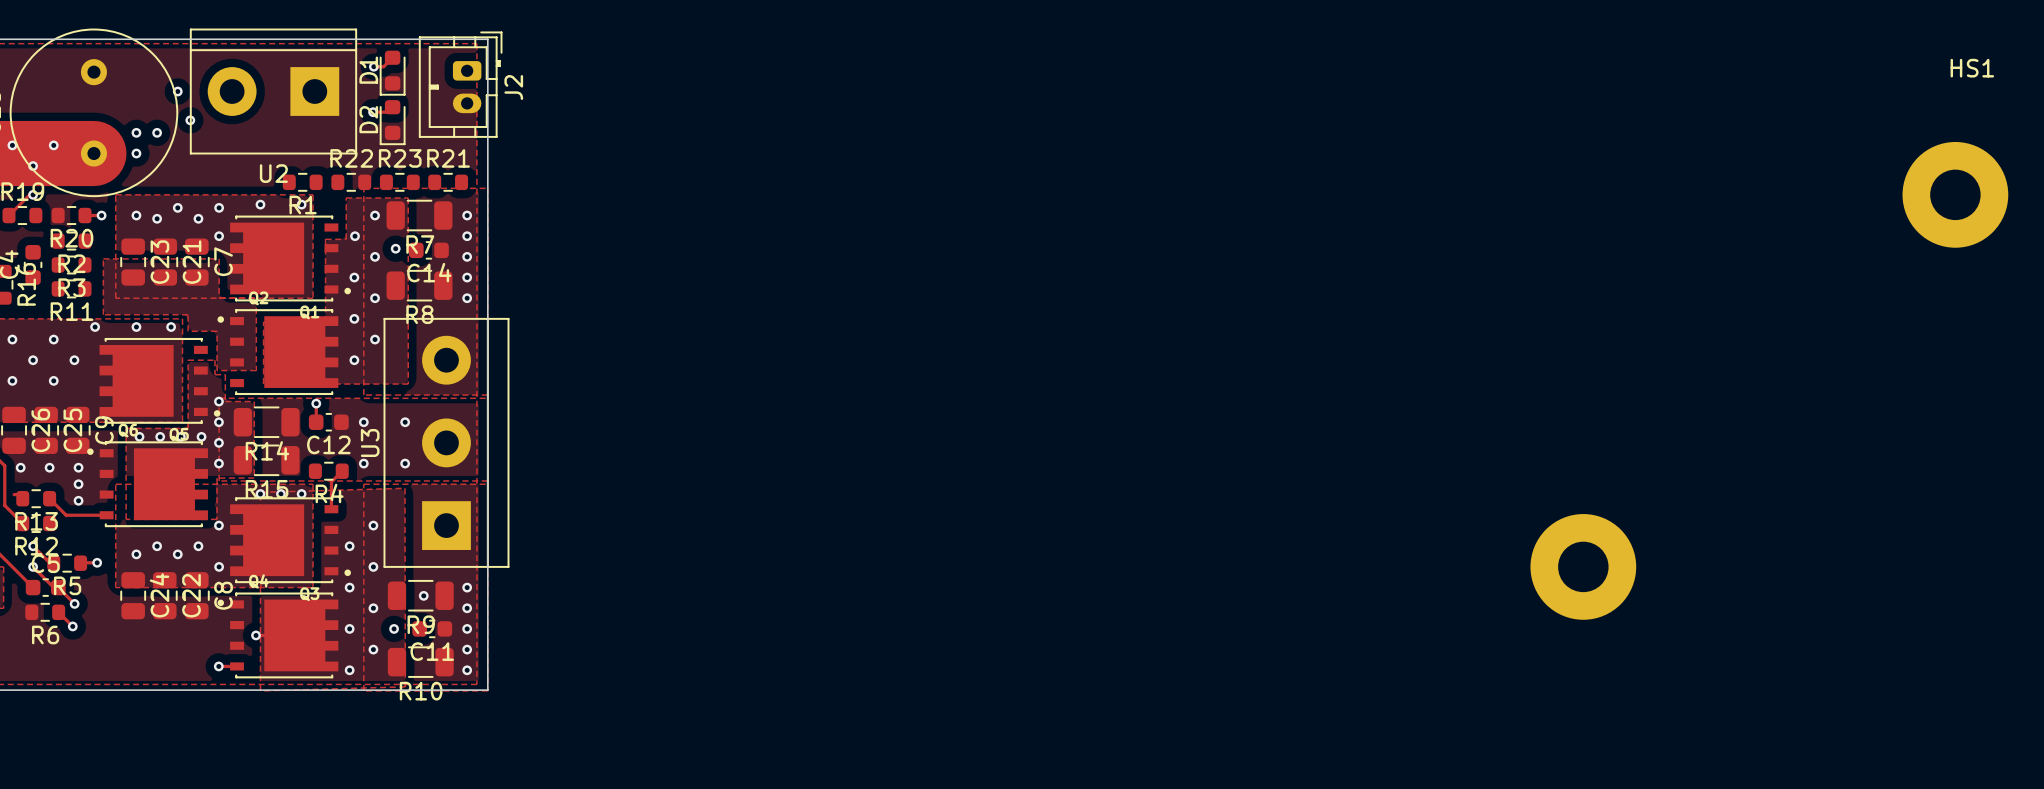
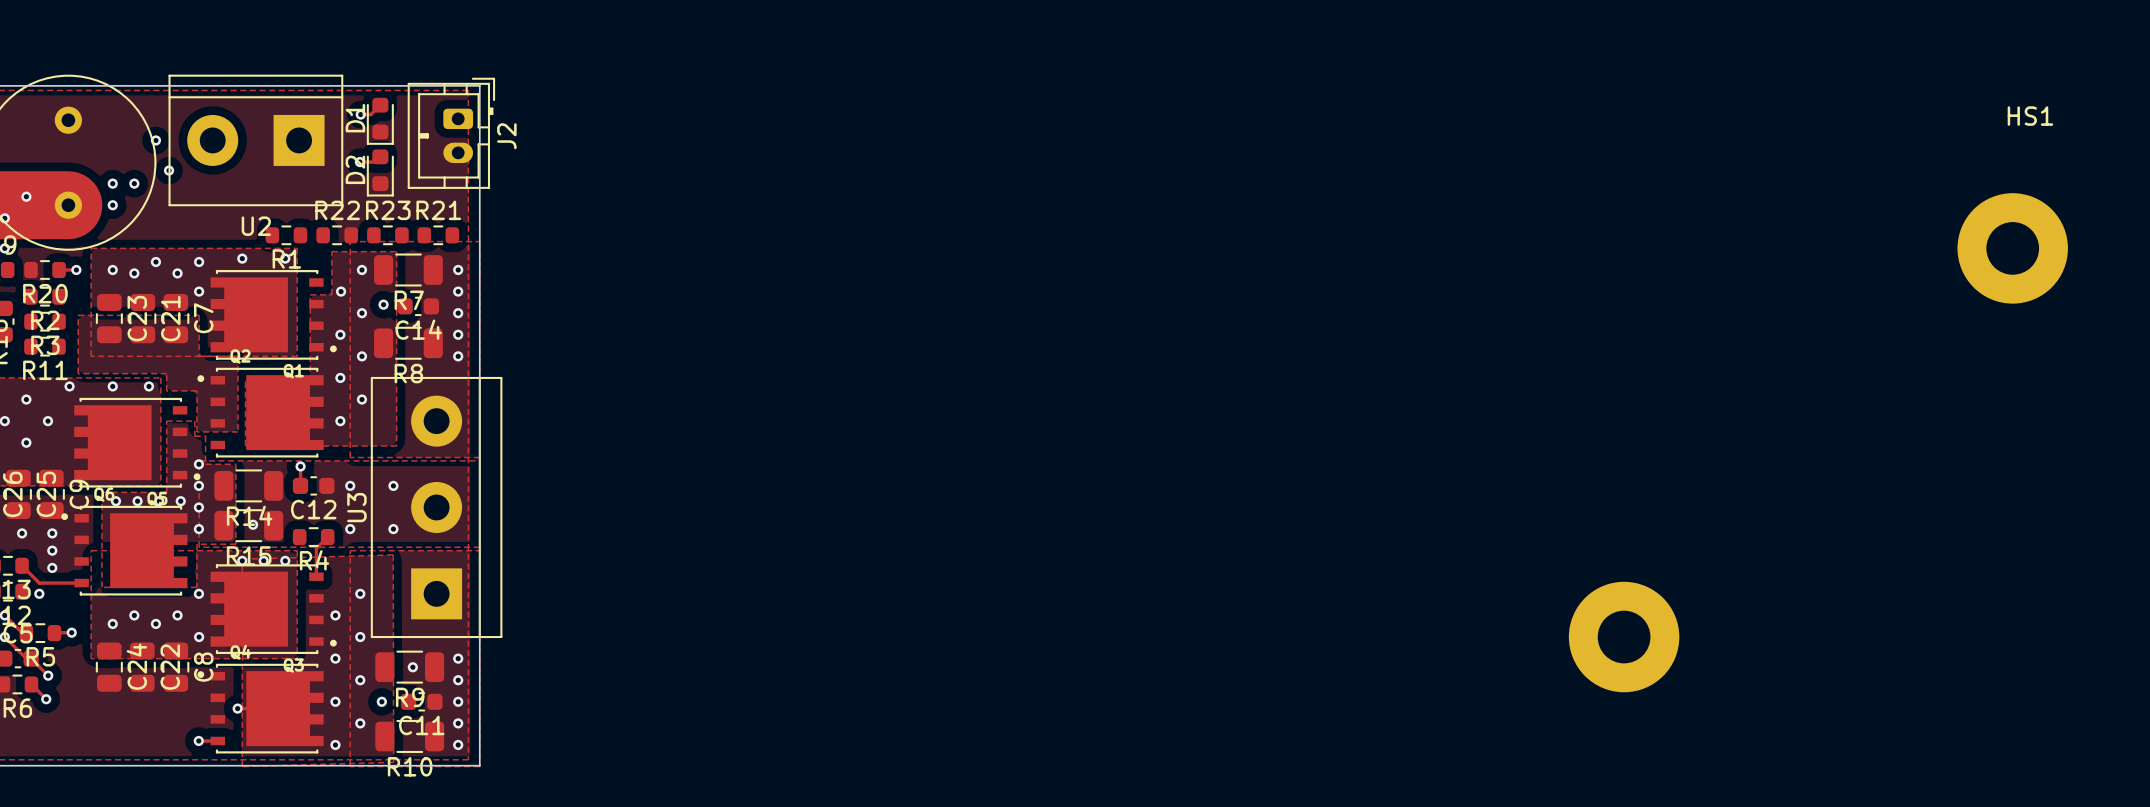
via: none -> (253, 524)
via: none -> (39, 593)

